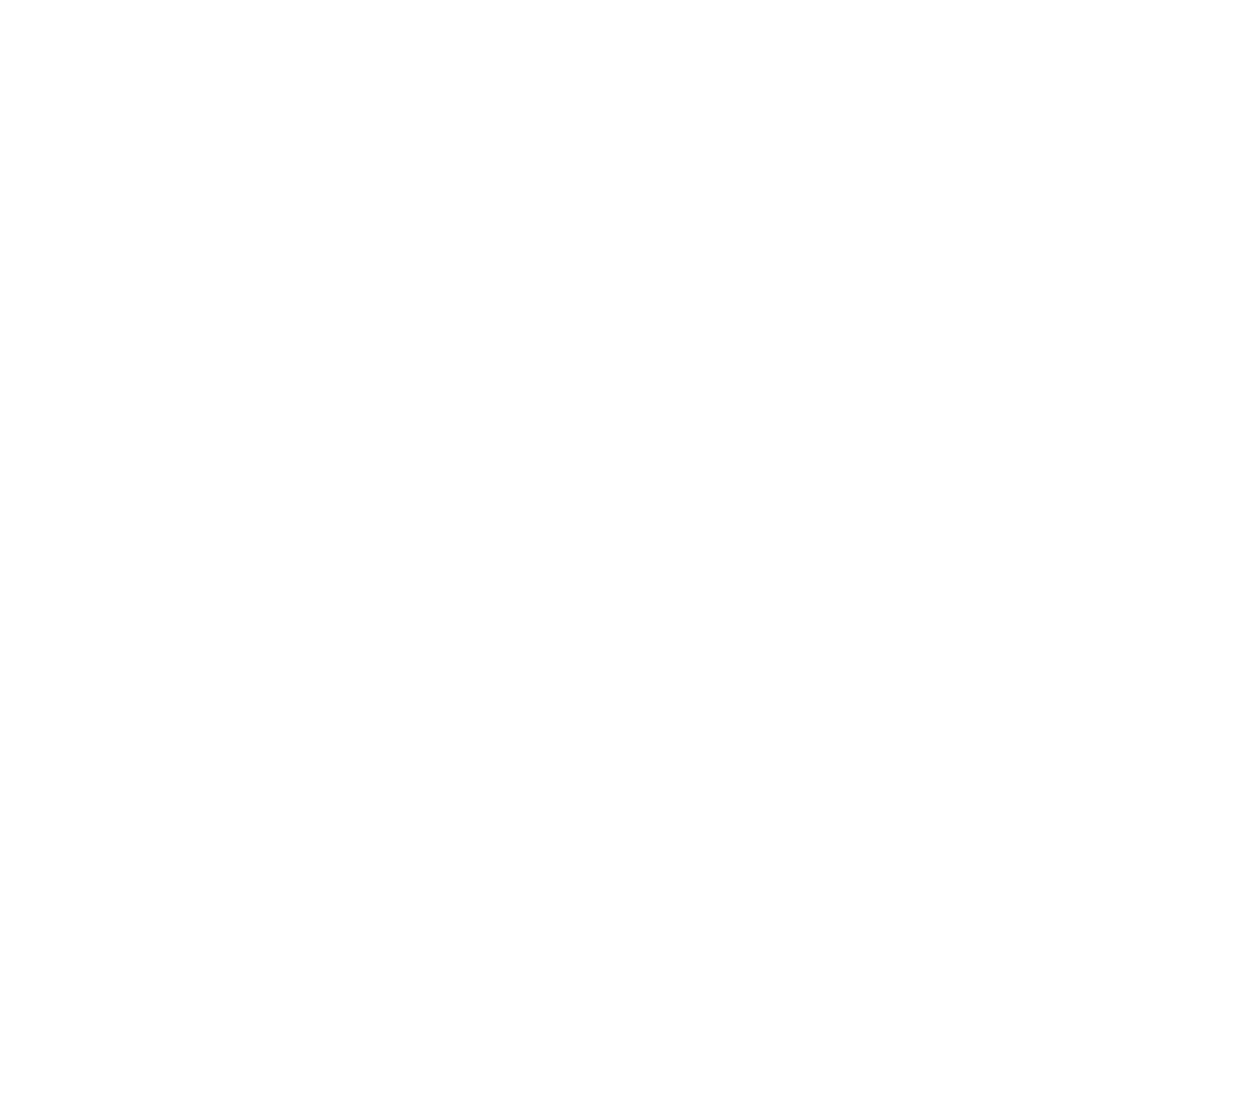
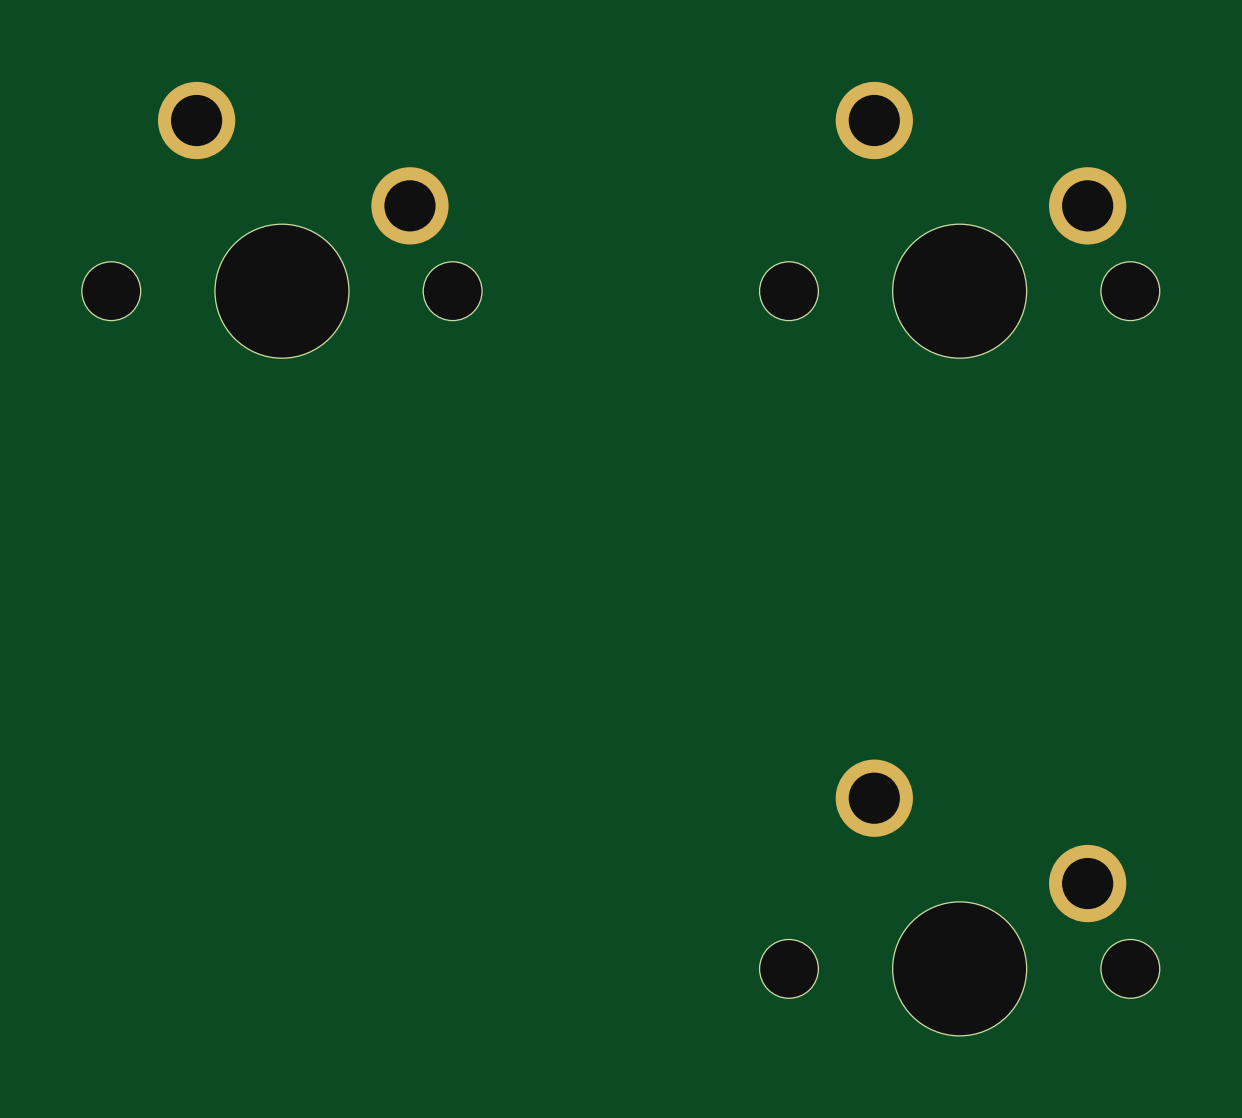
part: none -> (281, 220)
part: none -> (959, 220)
part: none -> (959, 897)

